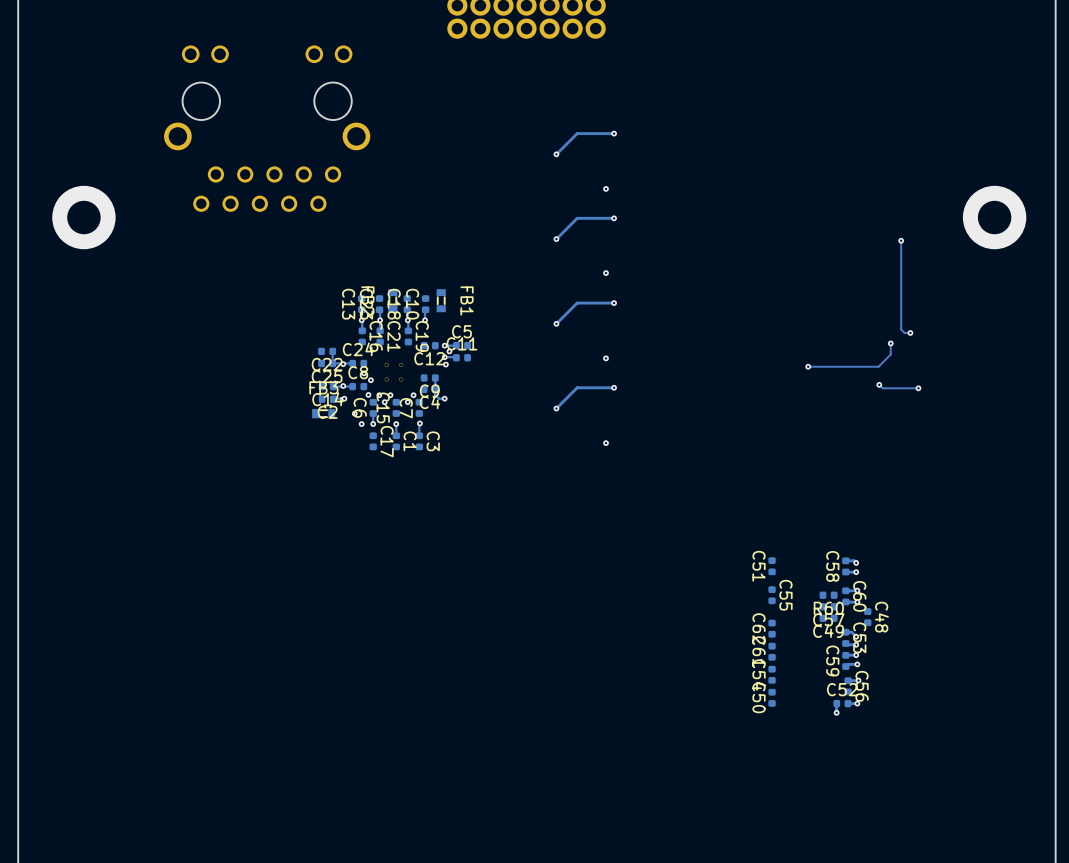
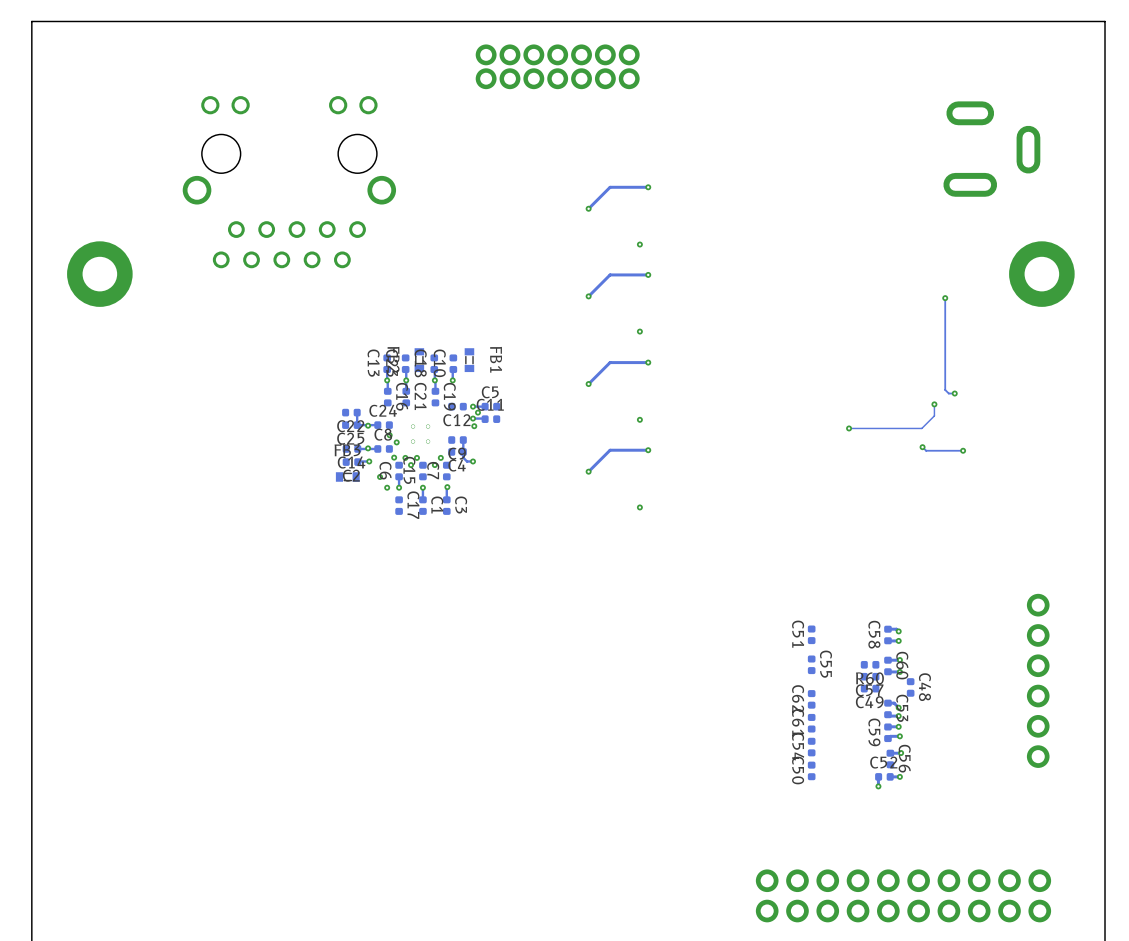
part: none -> (991, 149)
part: none -> (1038, 680)
part: none -> (903, 895)

